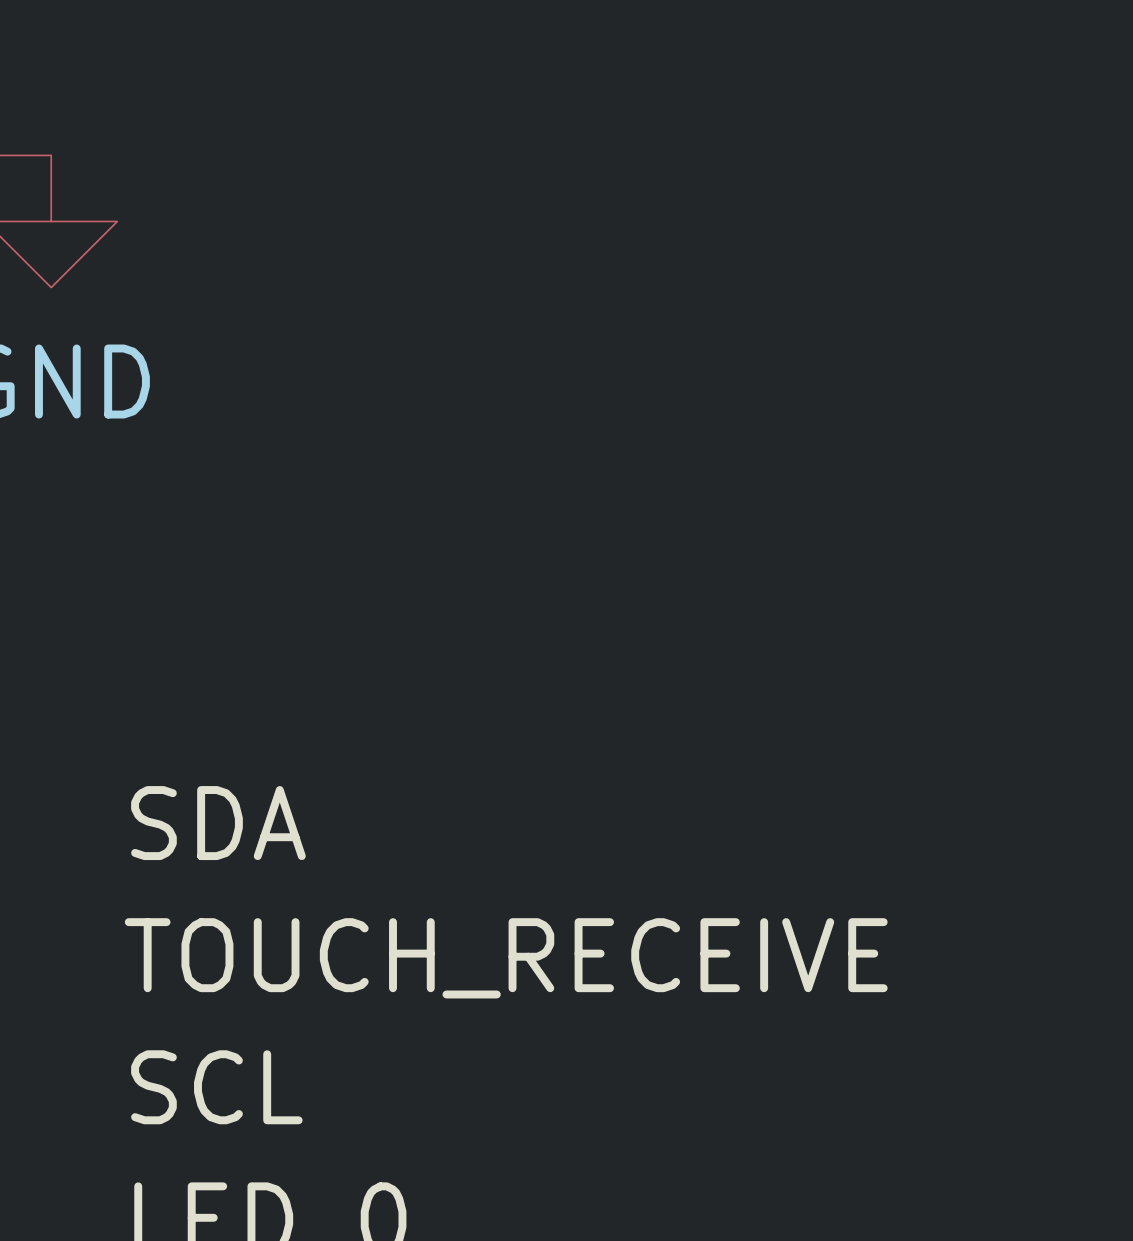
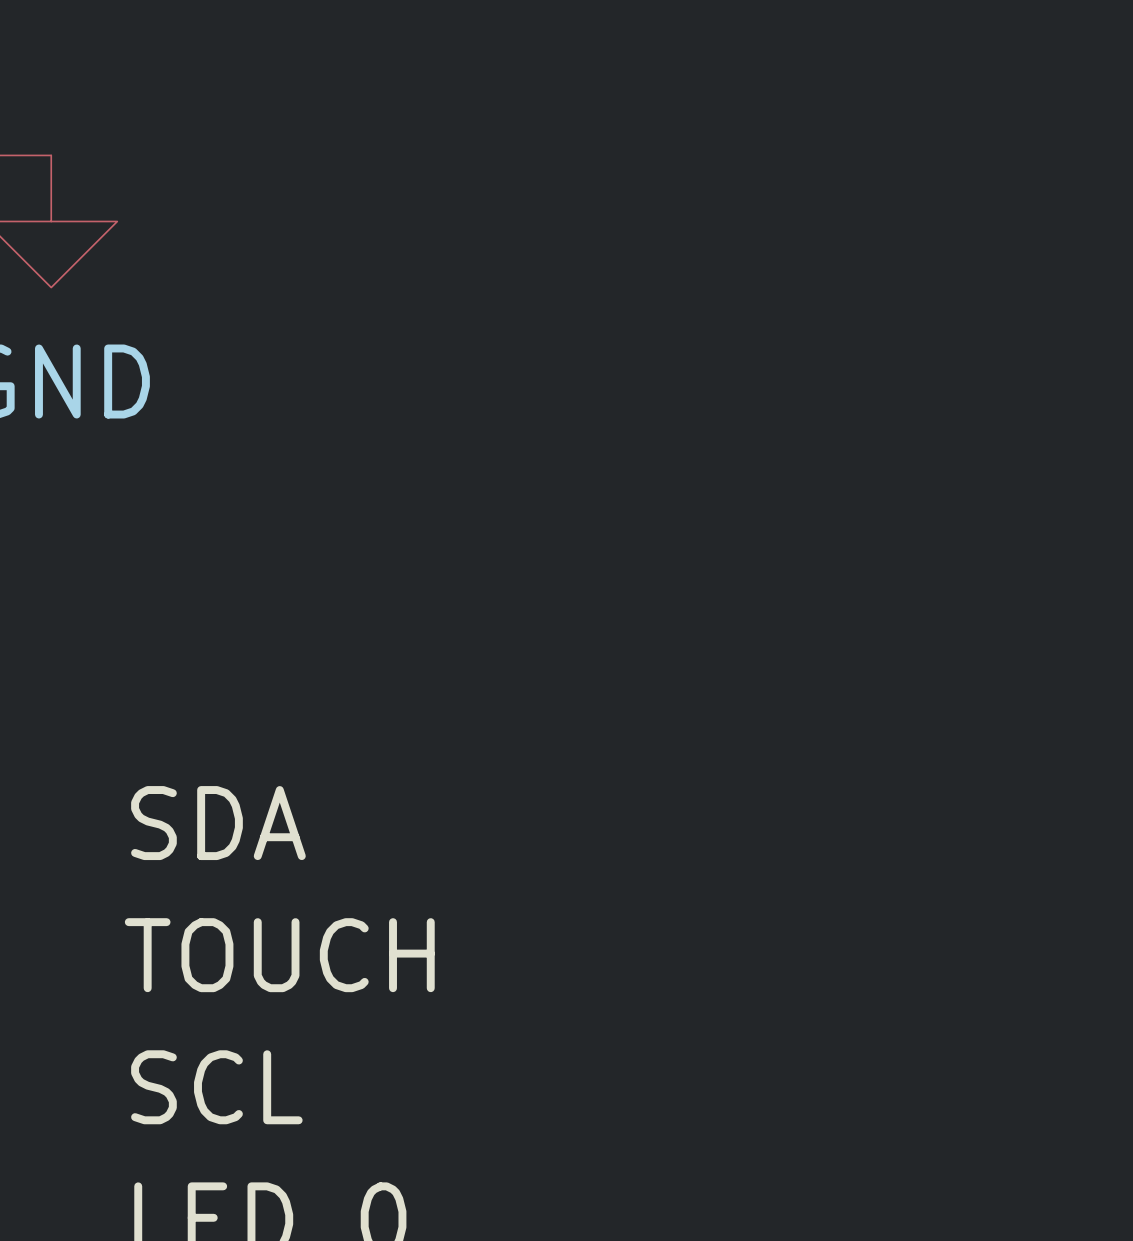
label: TOUCH_RECEIVE (506, 958) -> TOUCH (279, 955)

